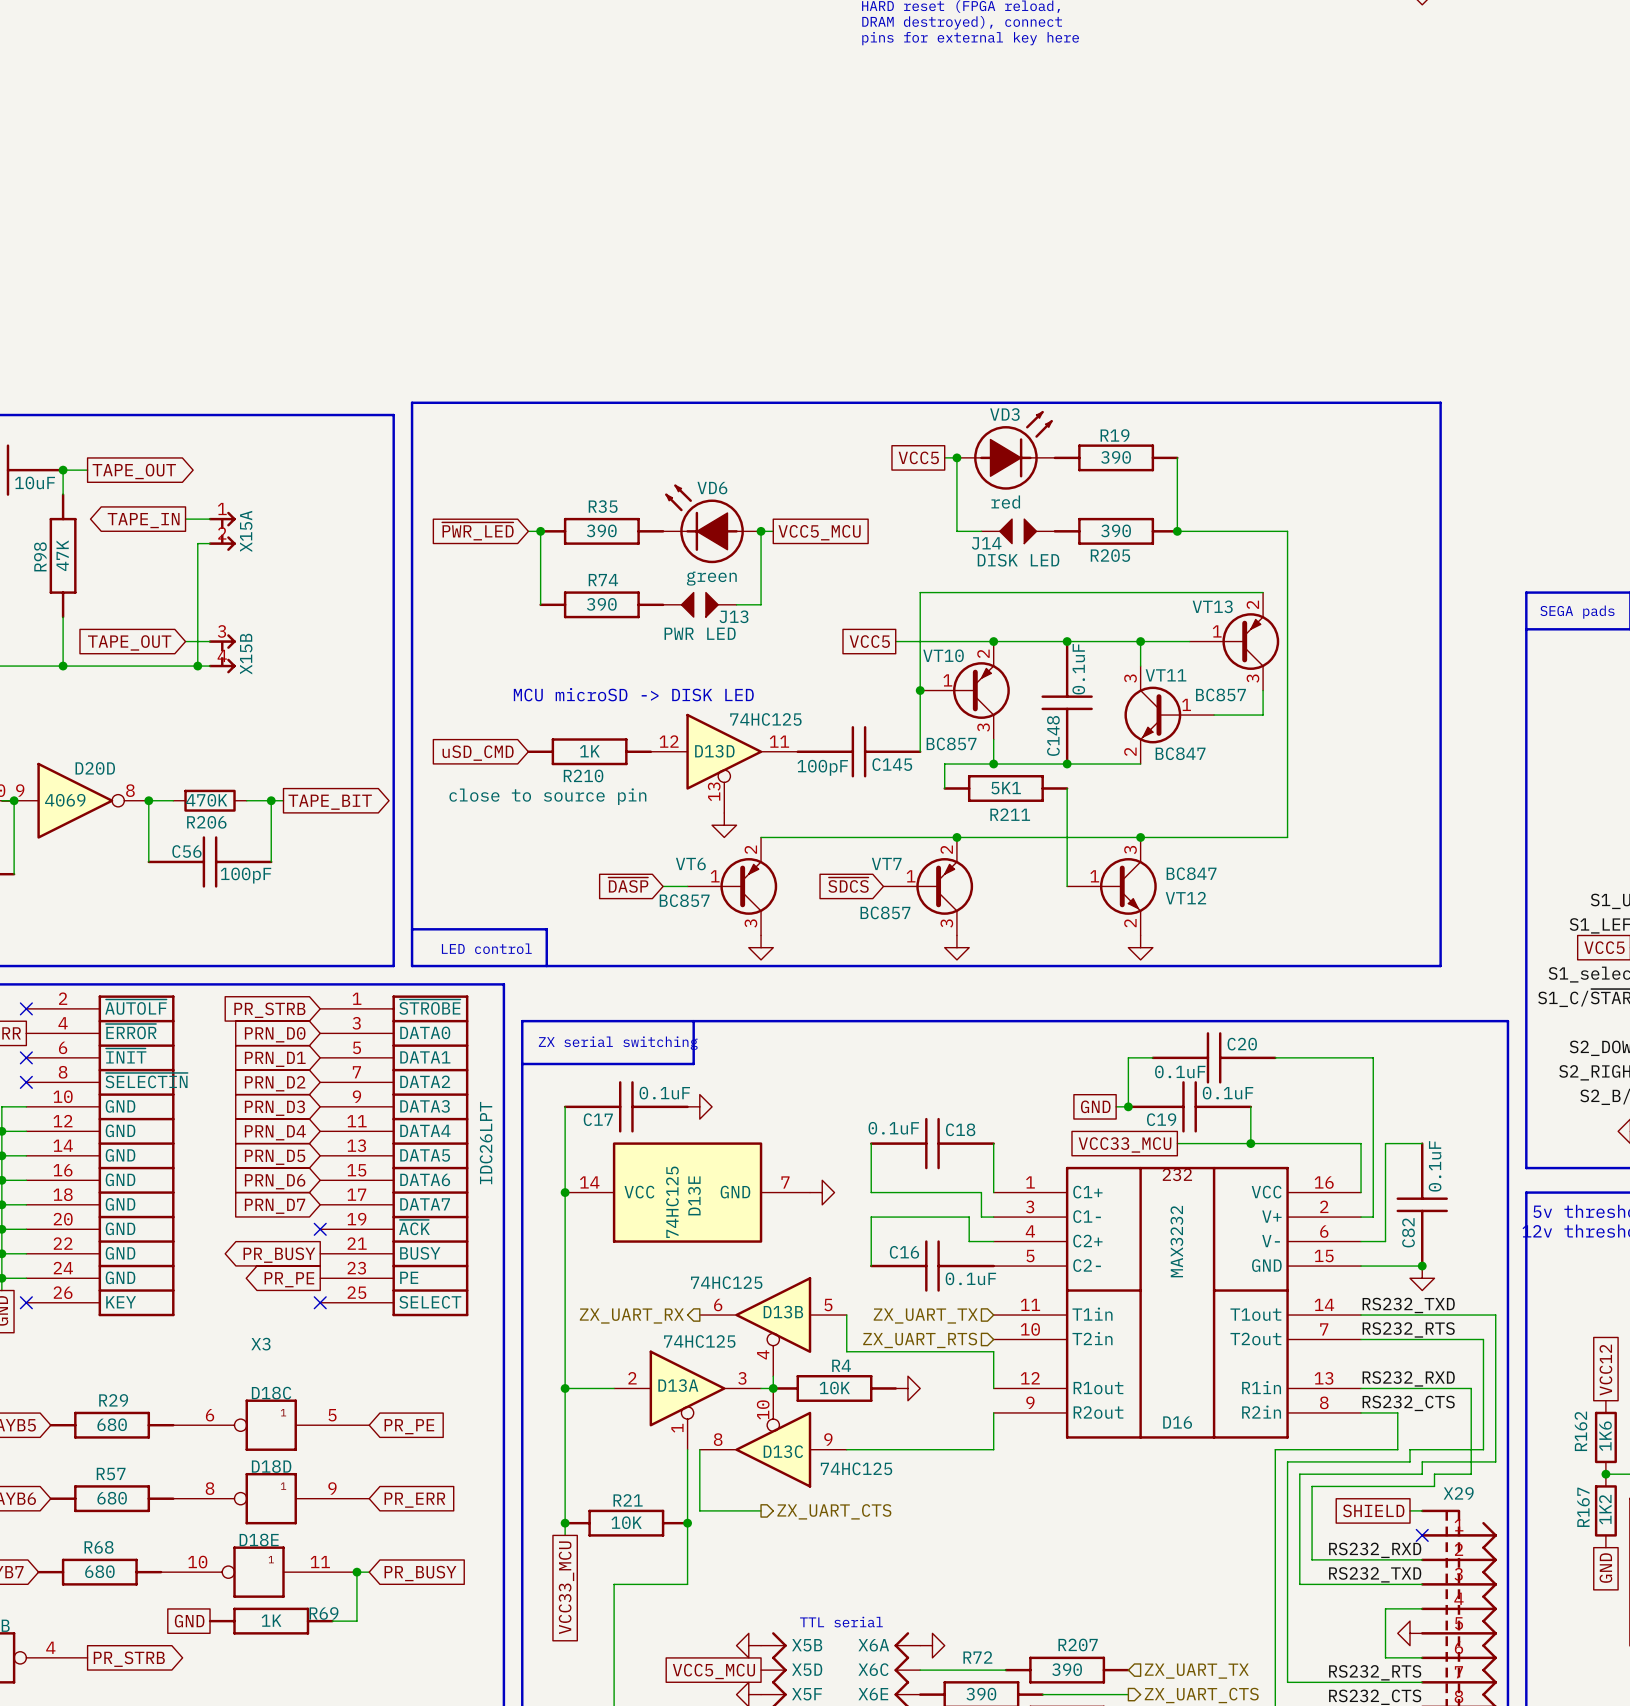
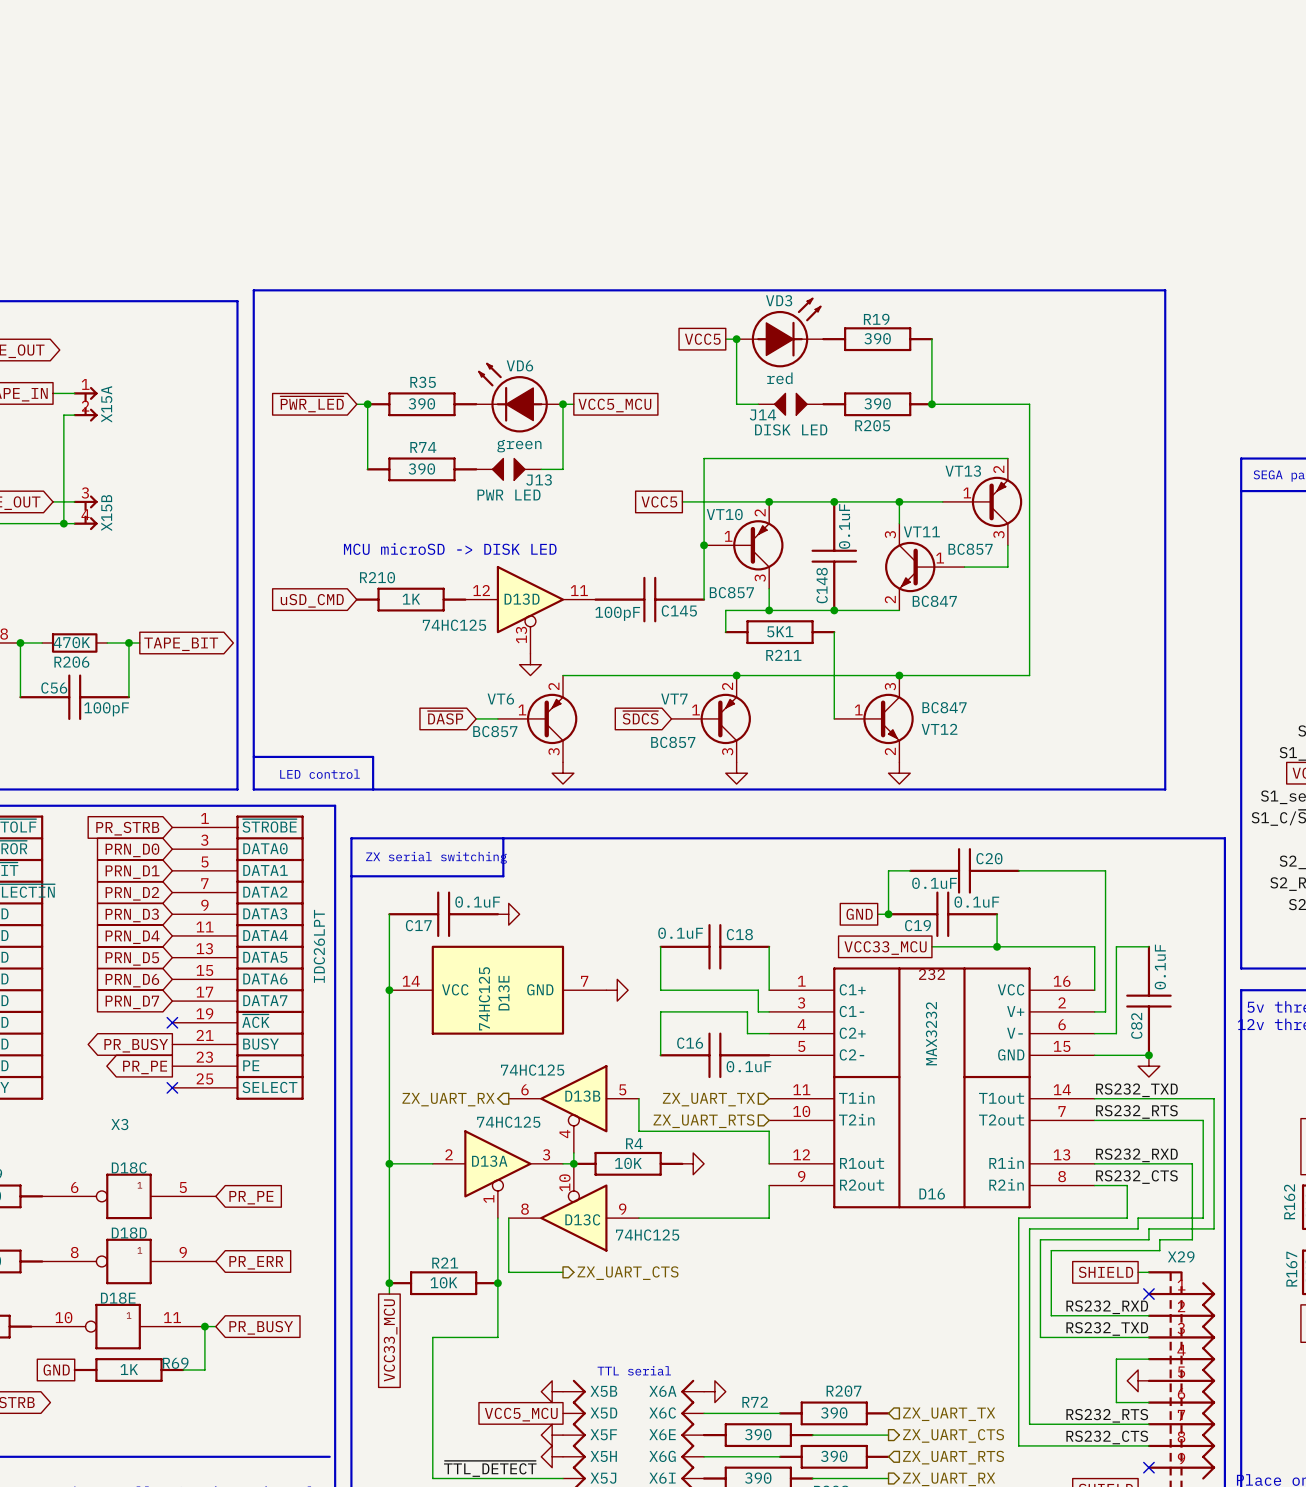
D13D value position: 74HC125 (765, 719) -> 74HC125 (454, 625)
R210 name position: R210 (583, 775) -> R210 (377, 577)
R210 text: close to source pin (547, 796) -> none

